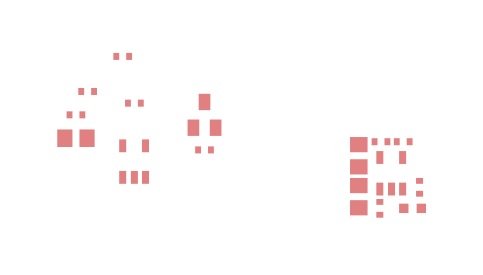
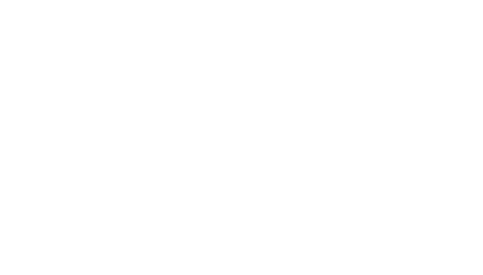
part: (122, 56) -> none
part: (87, 91) -> none
part: (134, 103) -> none
part: (75, 114) -> none
part: (204, 114) -> none
part: (75, 138) -> none
part: (380, 141) -> none
part: (403, 141) -> none
part: (204, 149) -> none
part: (358, 155) -> none
part: (134, 161) -> none
part: (391, 173) -> none
part: (419, 187) -> none
part: (358, 196) -> none
part: (379, 208) -> none
part: (412, 208) -> none

